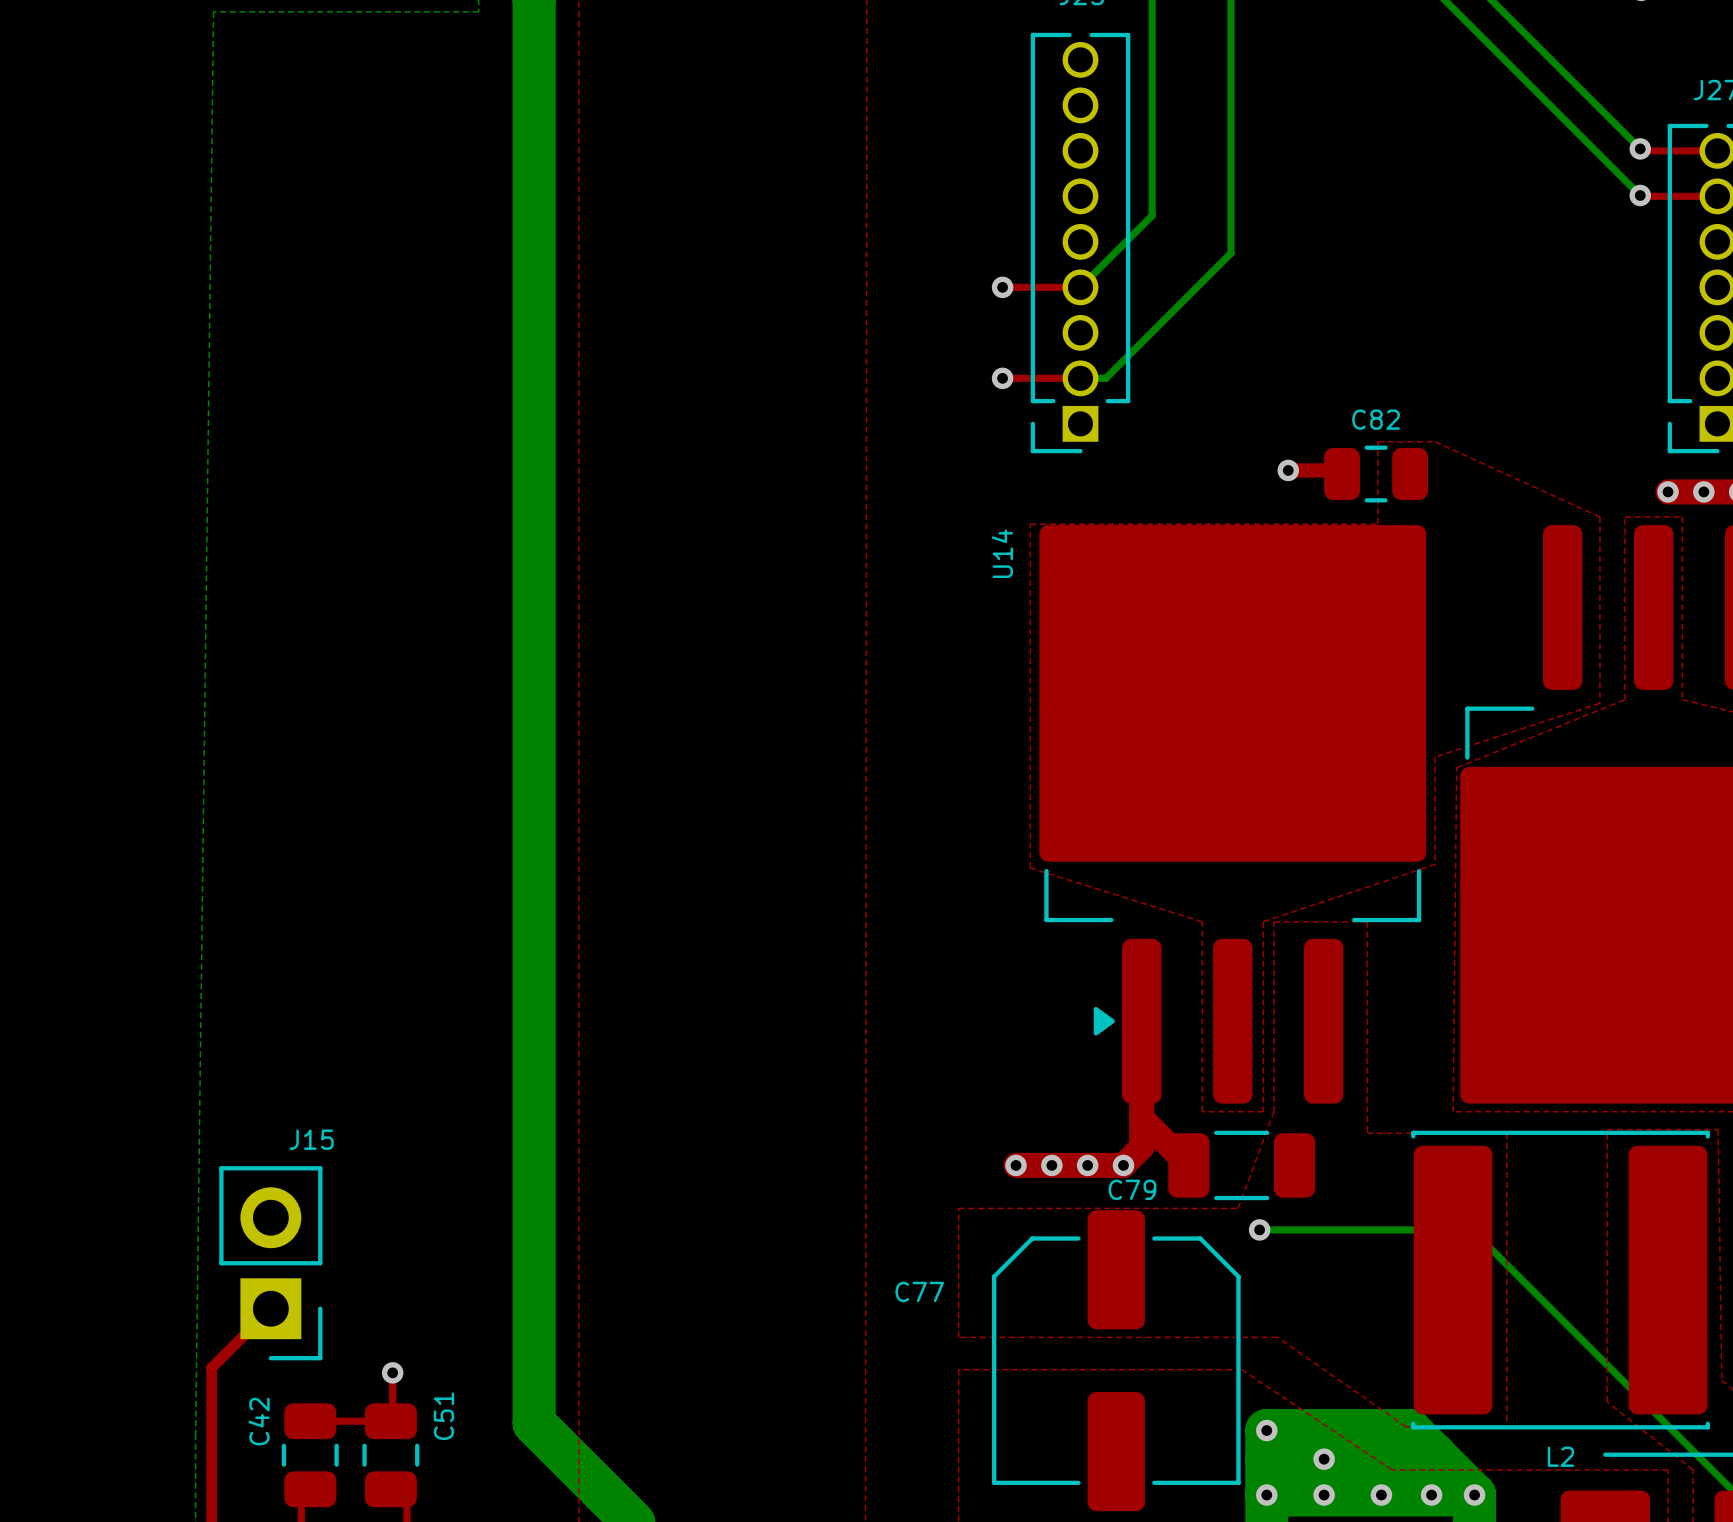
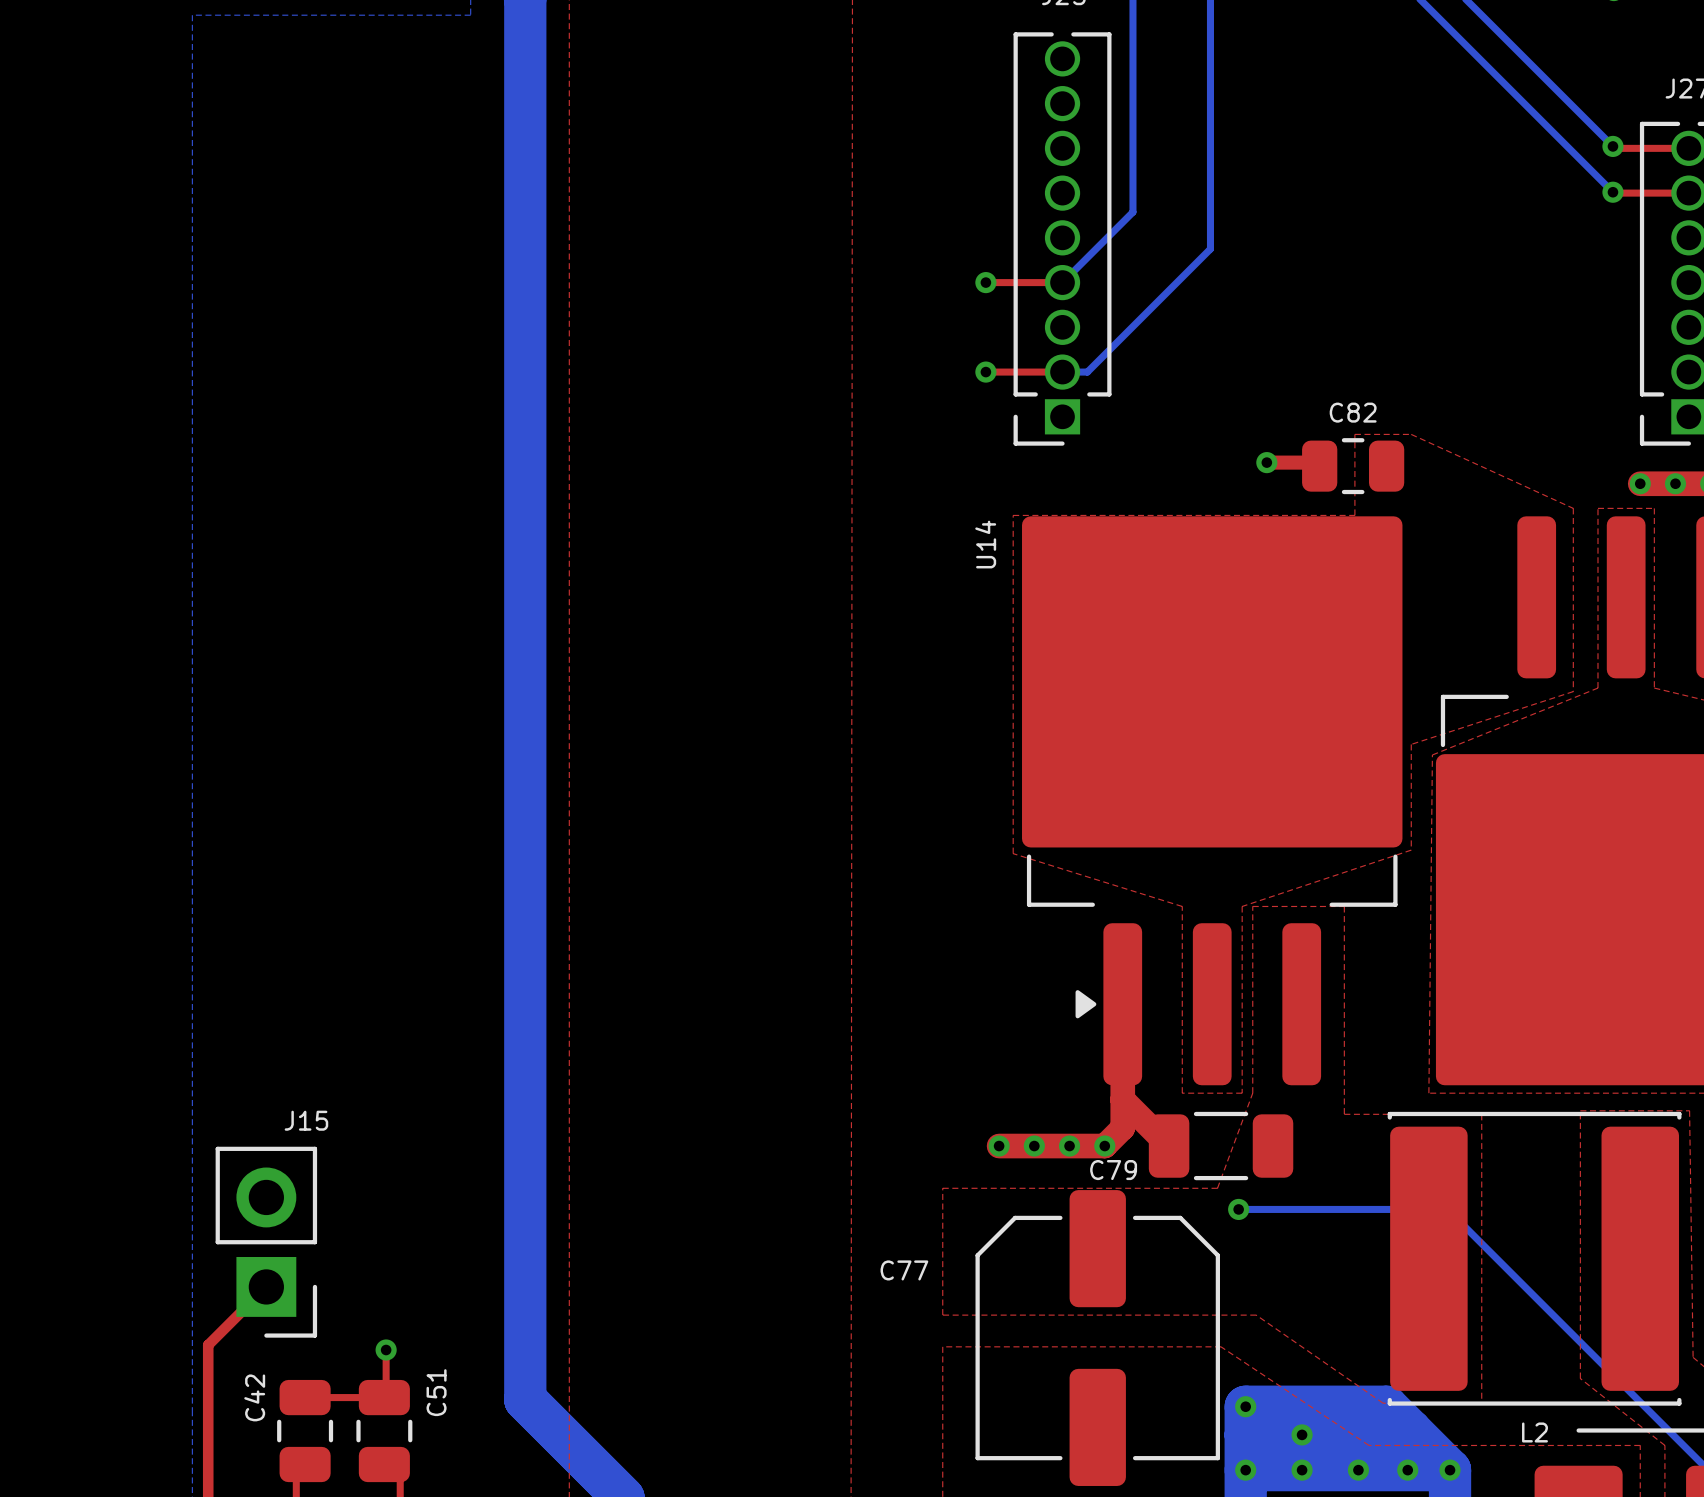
bottom zone outline: (478, 11) (213, 11) (195, 1434) -> (470, 11) (470, 15) (192, 15) (192, 1410)

